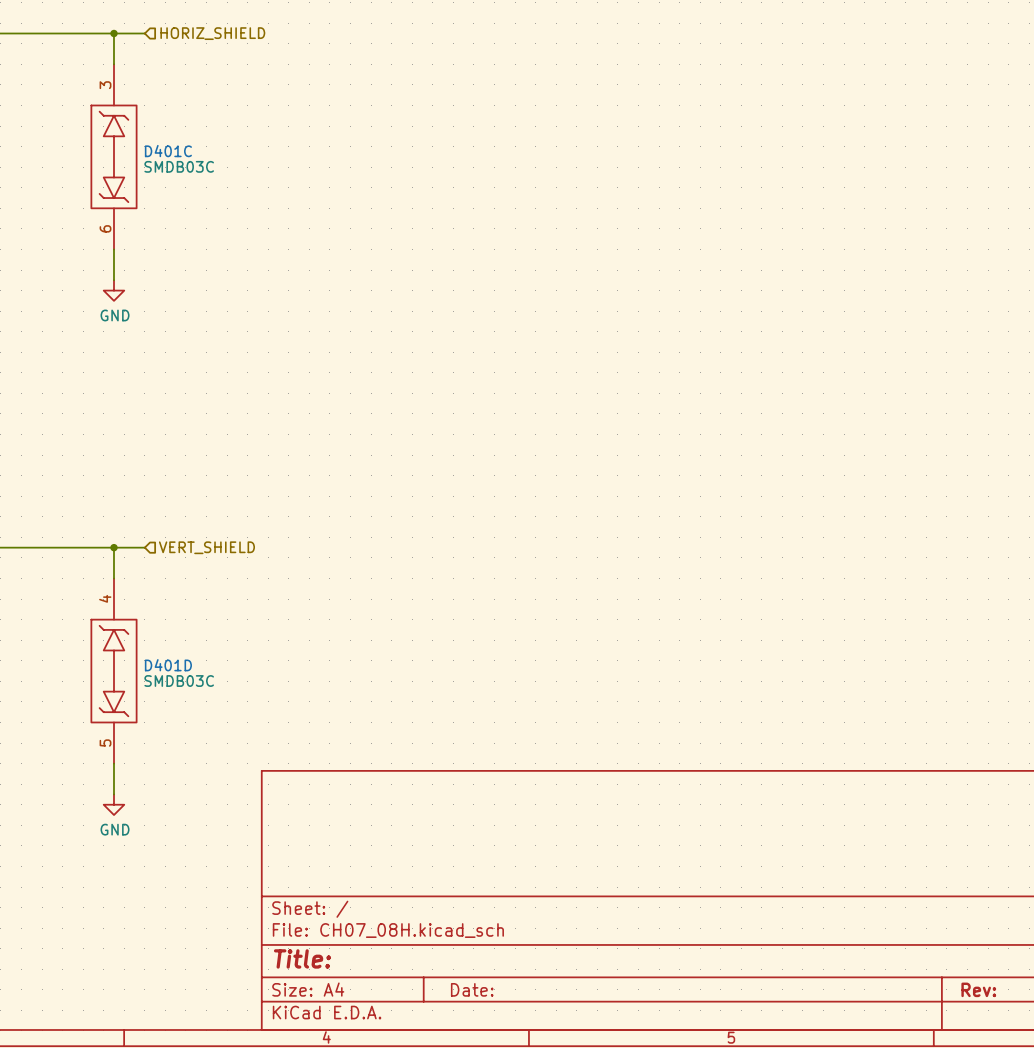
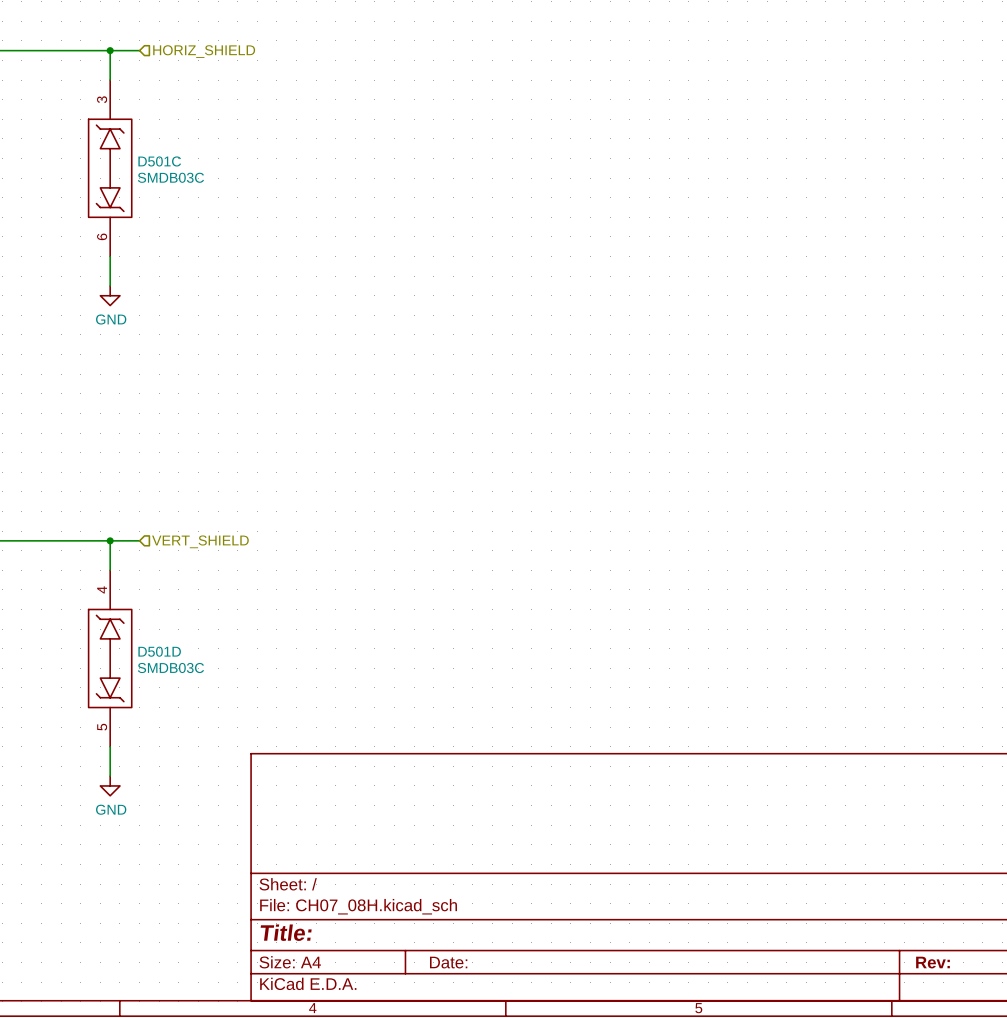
D401C name: D401C (168, 151) -> D501C (159, 161)
D401D name: D401D (168, 665) -> D501D (159, 651)

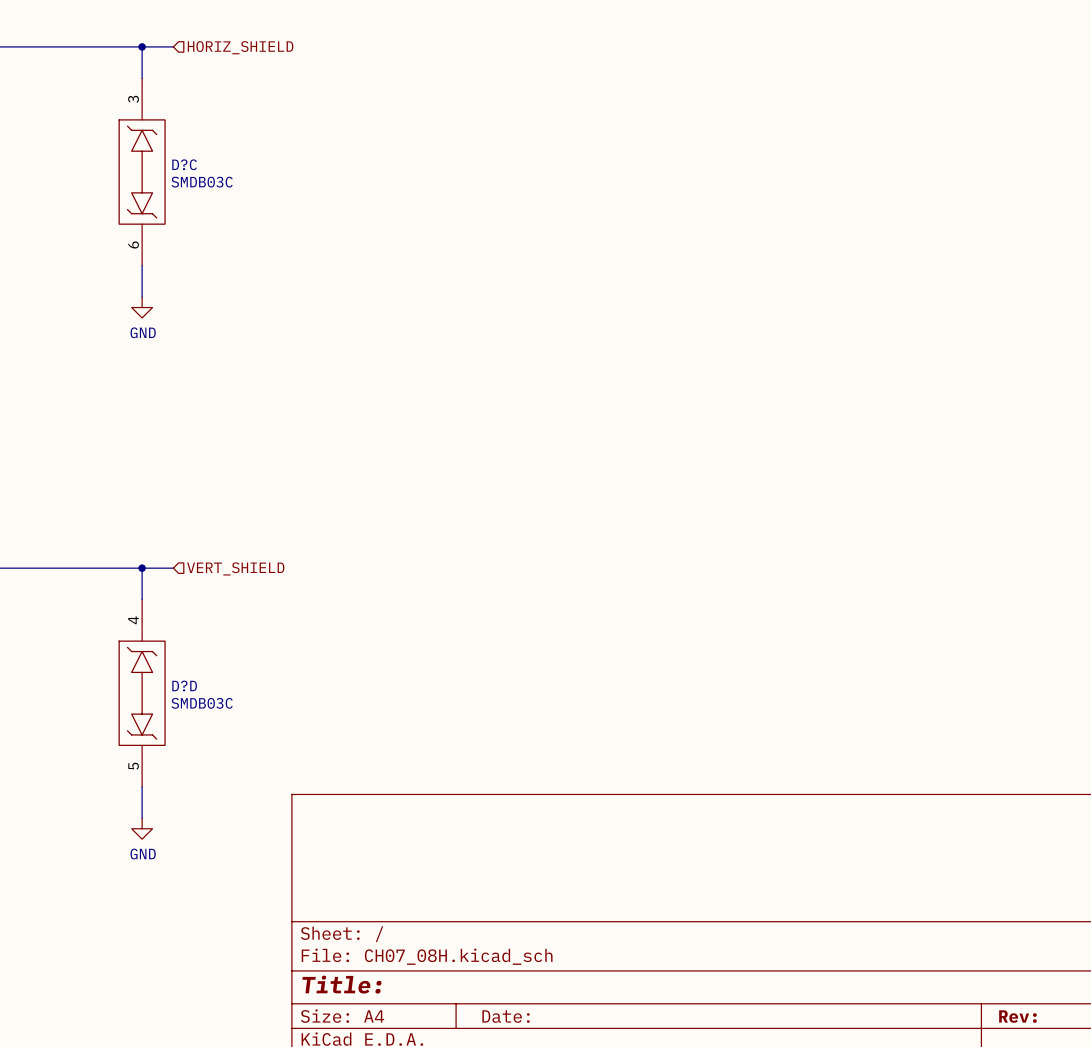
D501C name: D501C (159, 161) -> D?C (184, 164)
D501D name: D501D (159, 651) -> D?D (184, 685)

